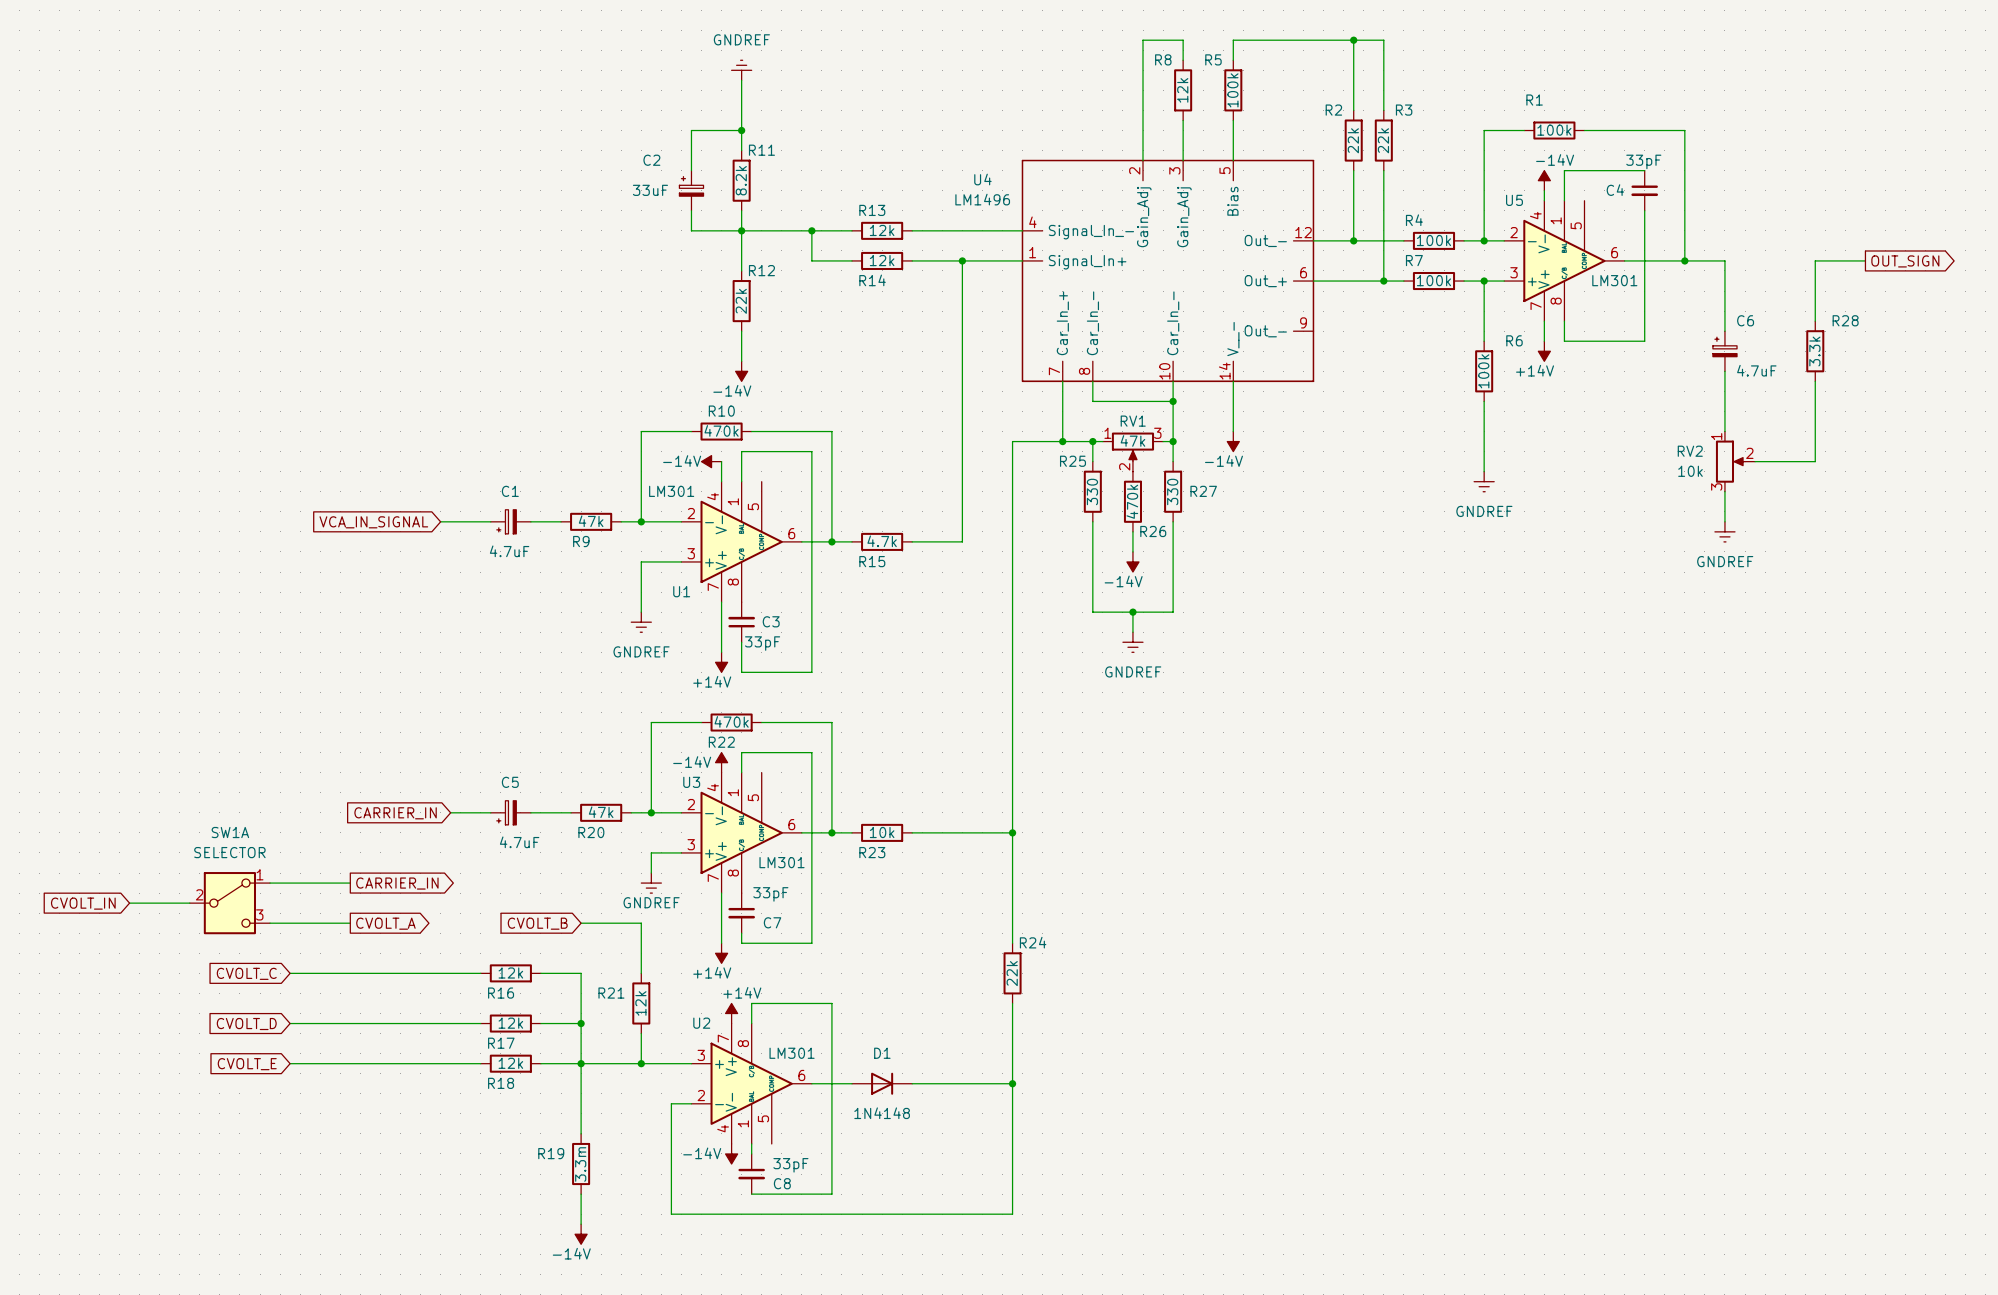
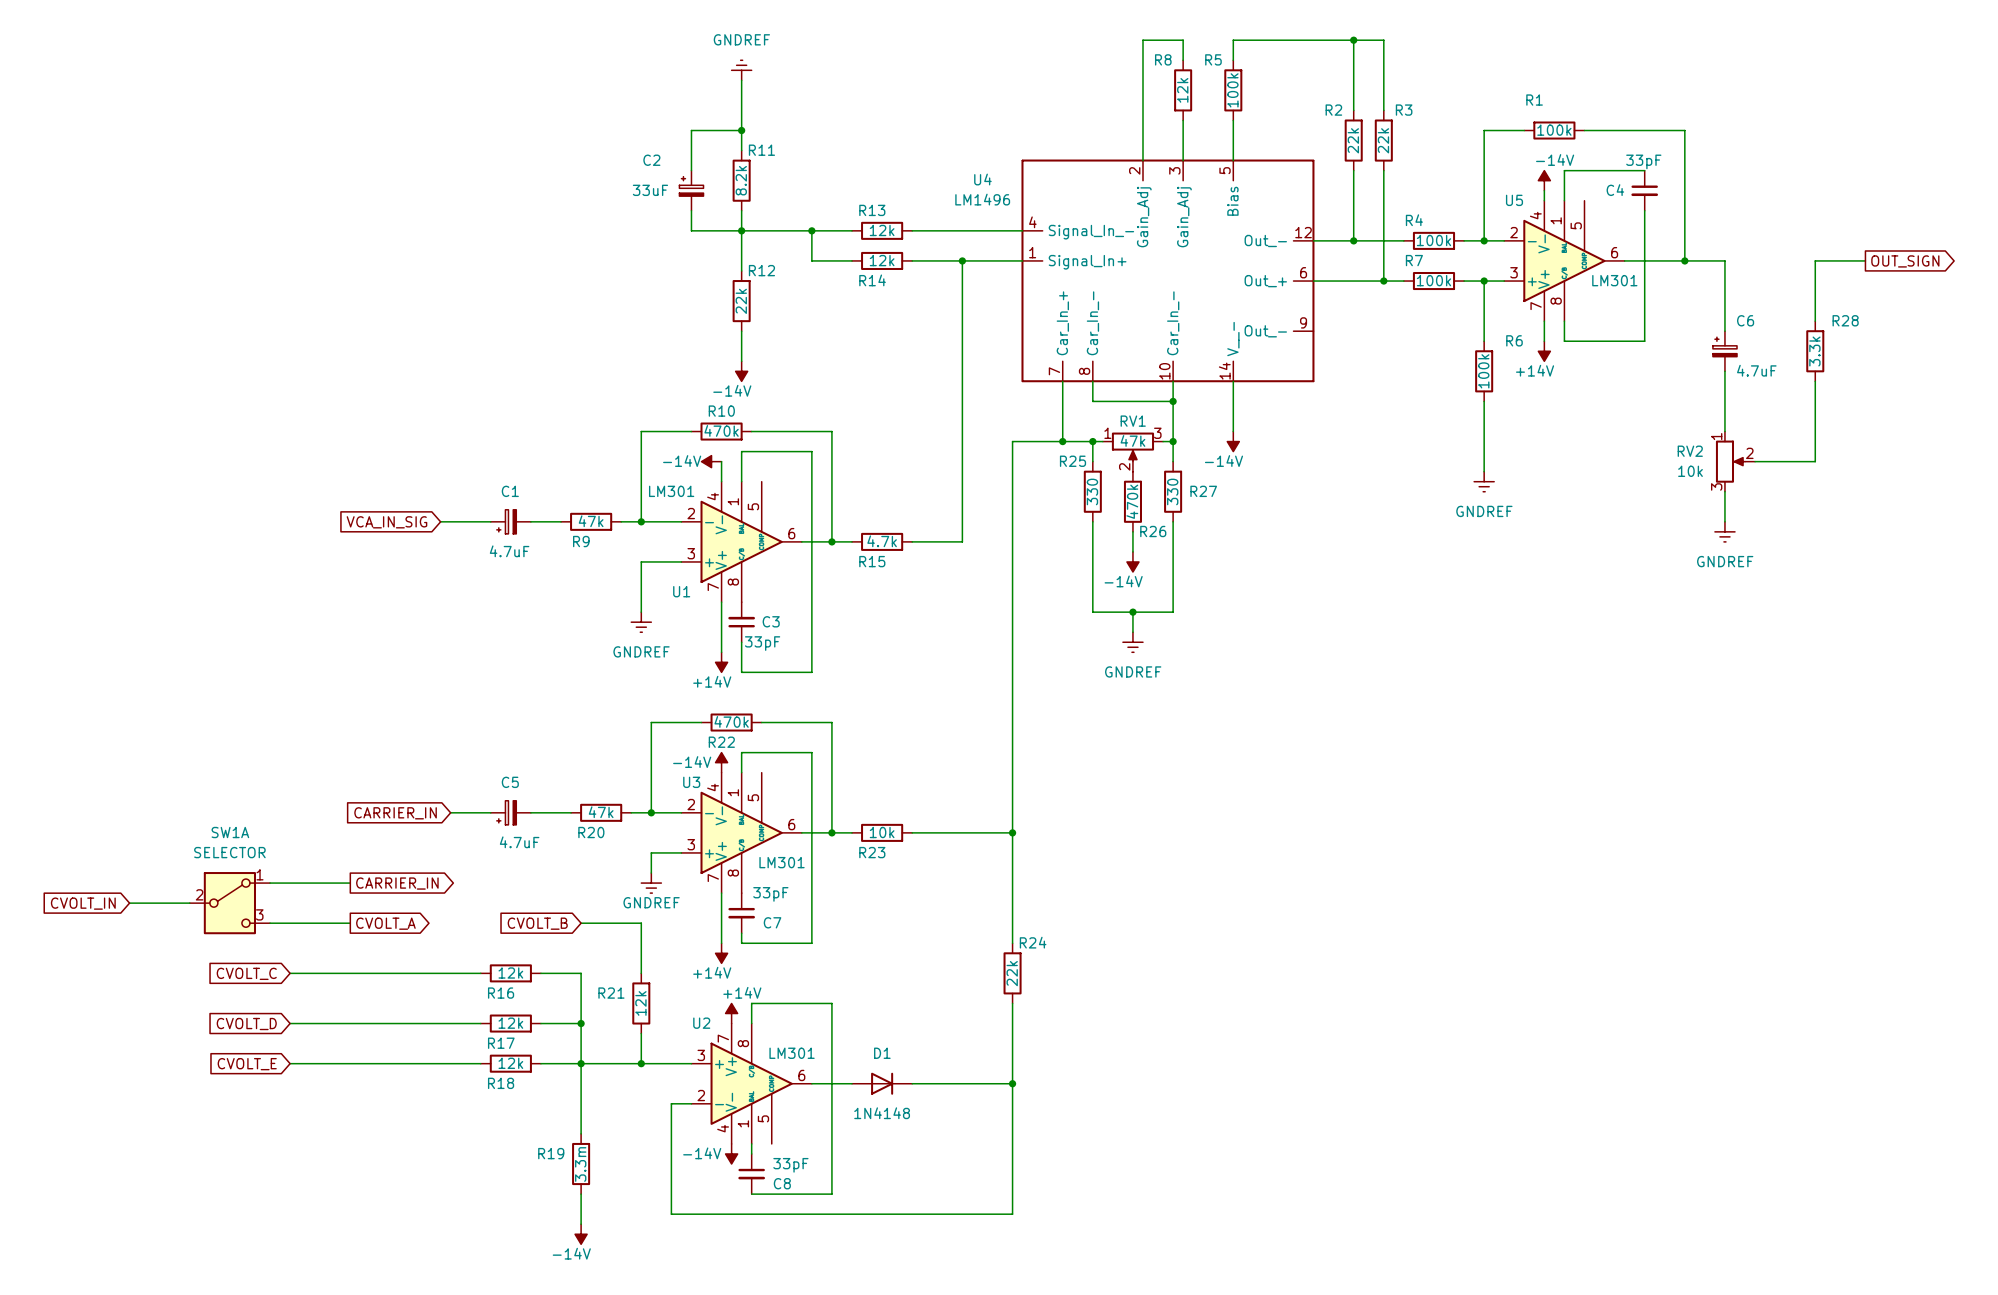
global label: VCA_IN_SIGNAL (373, 522) -> VCA_IN_SIG (386, 522)

